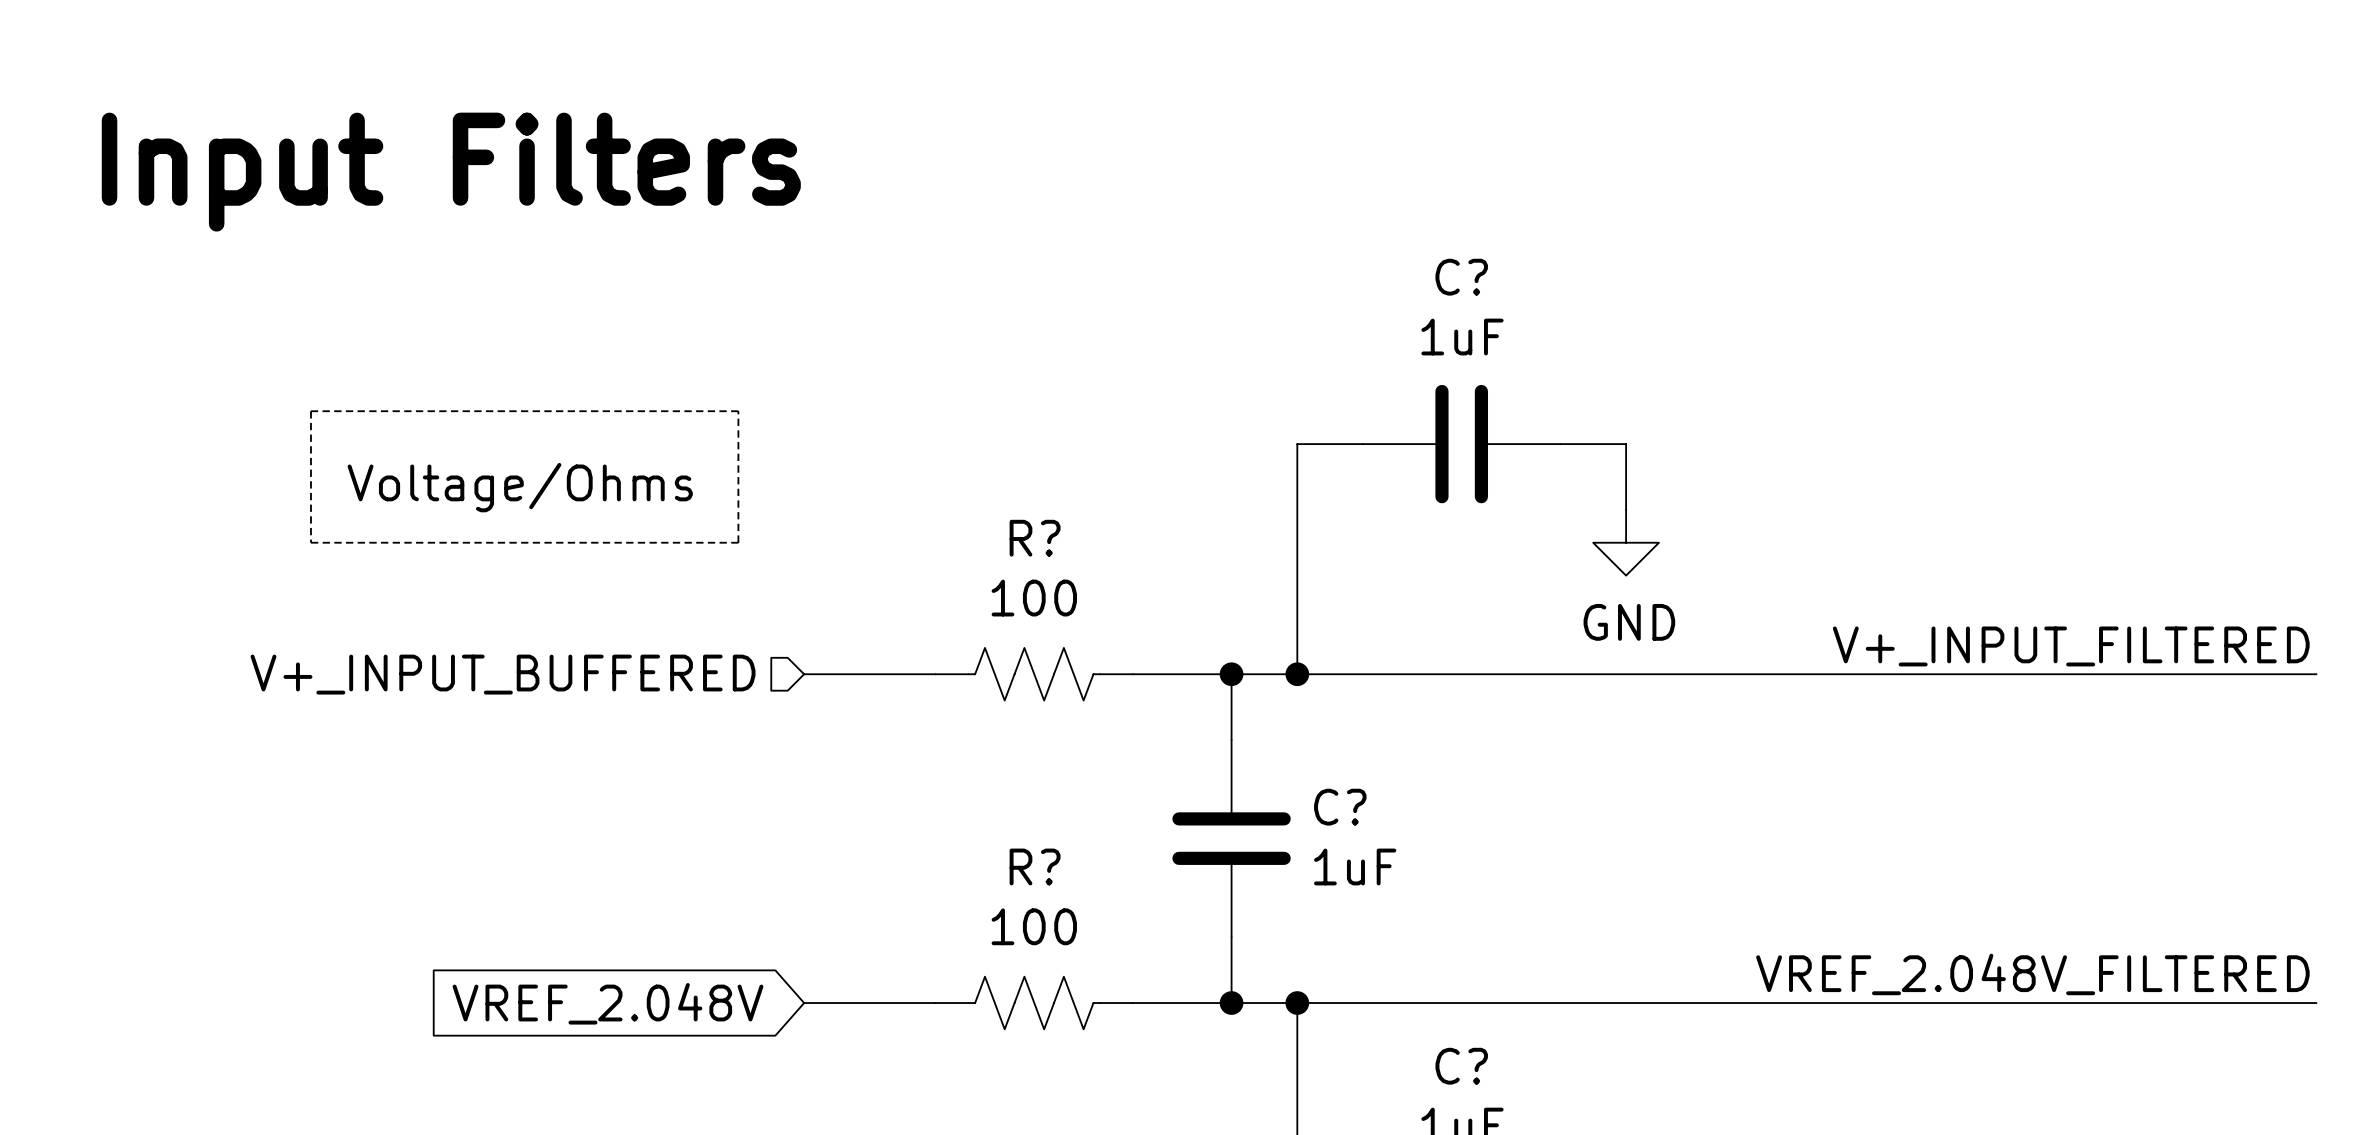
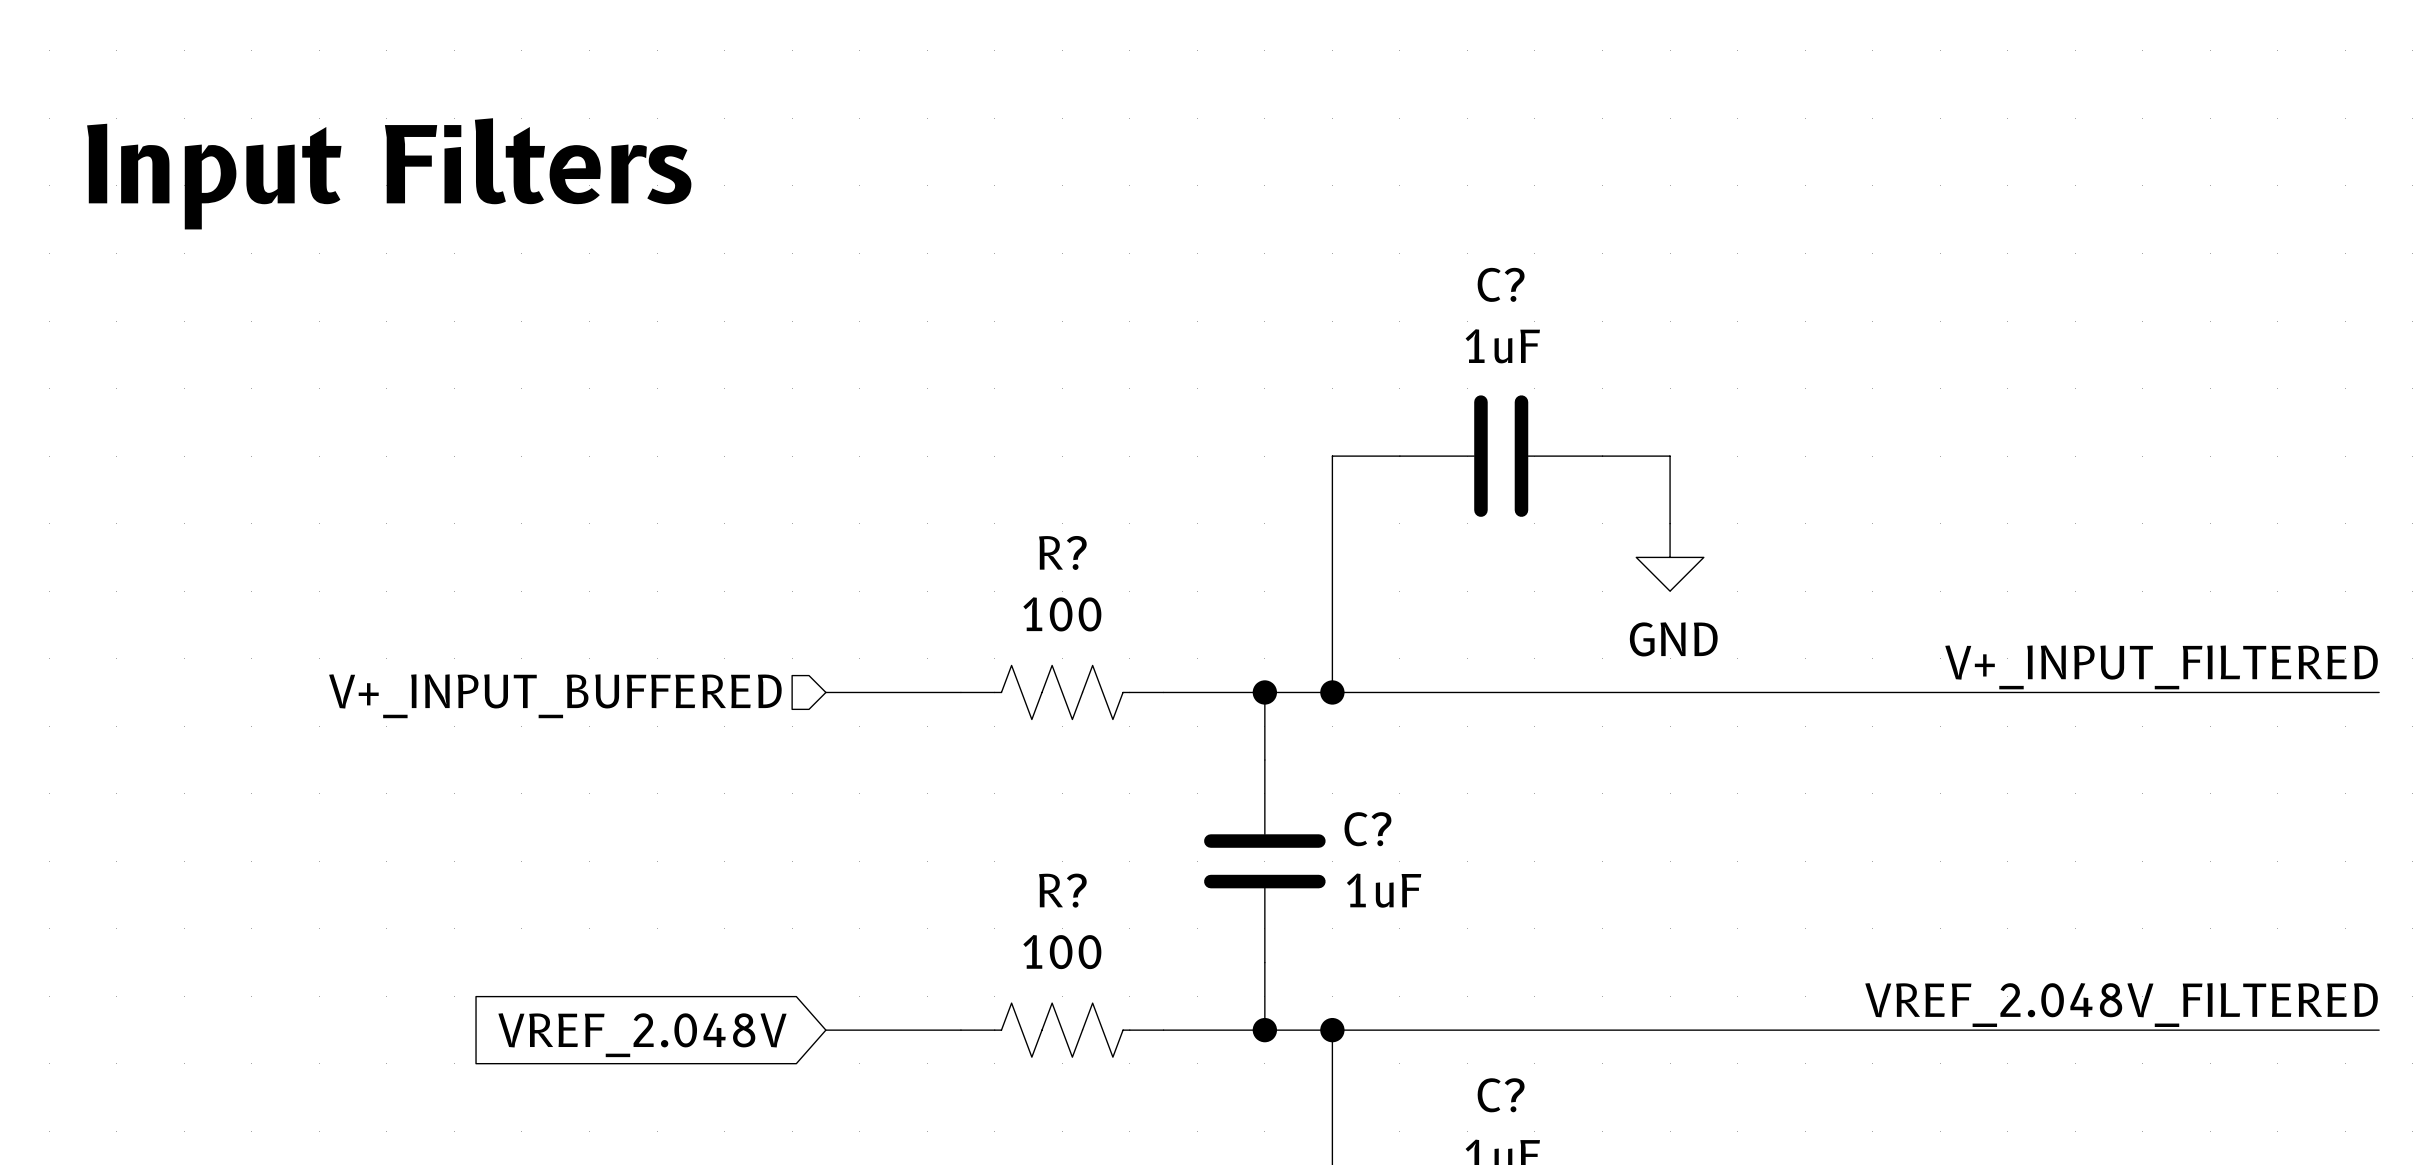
line: (310, 411) (310, 542) (738, 542) (738, 411) (310, 411) -> none
text: Voltage/Ohms (520, 487) -> none

